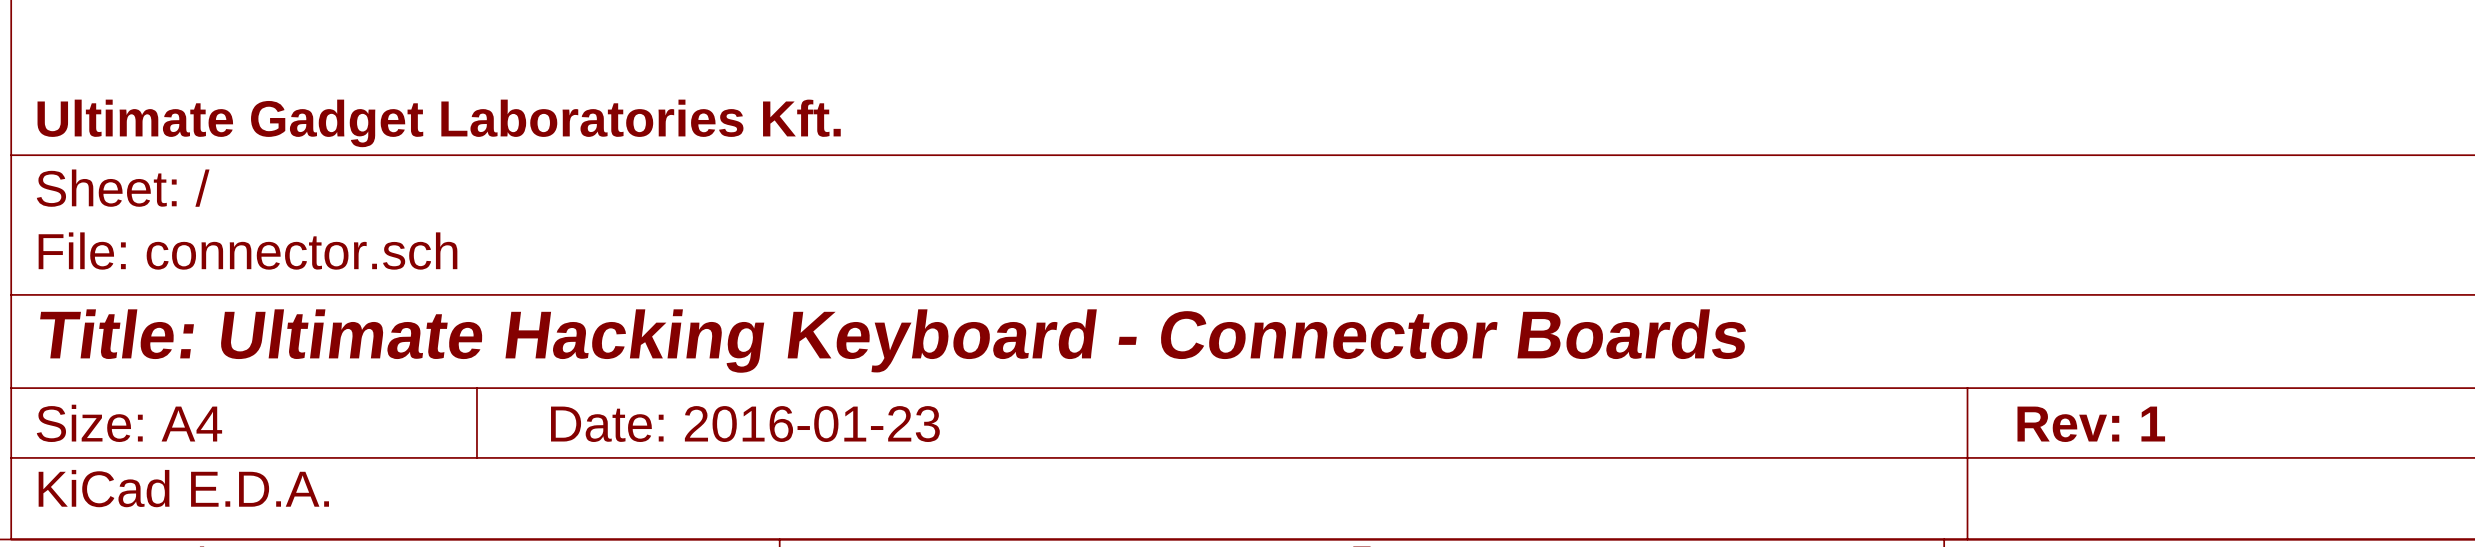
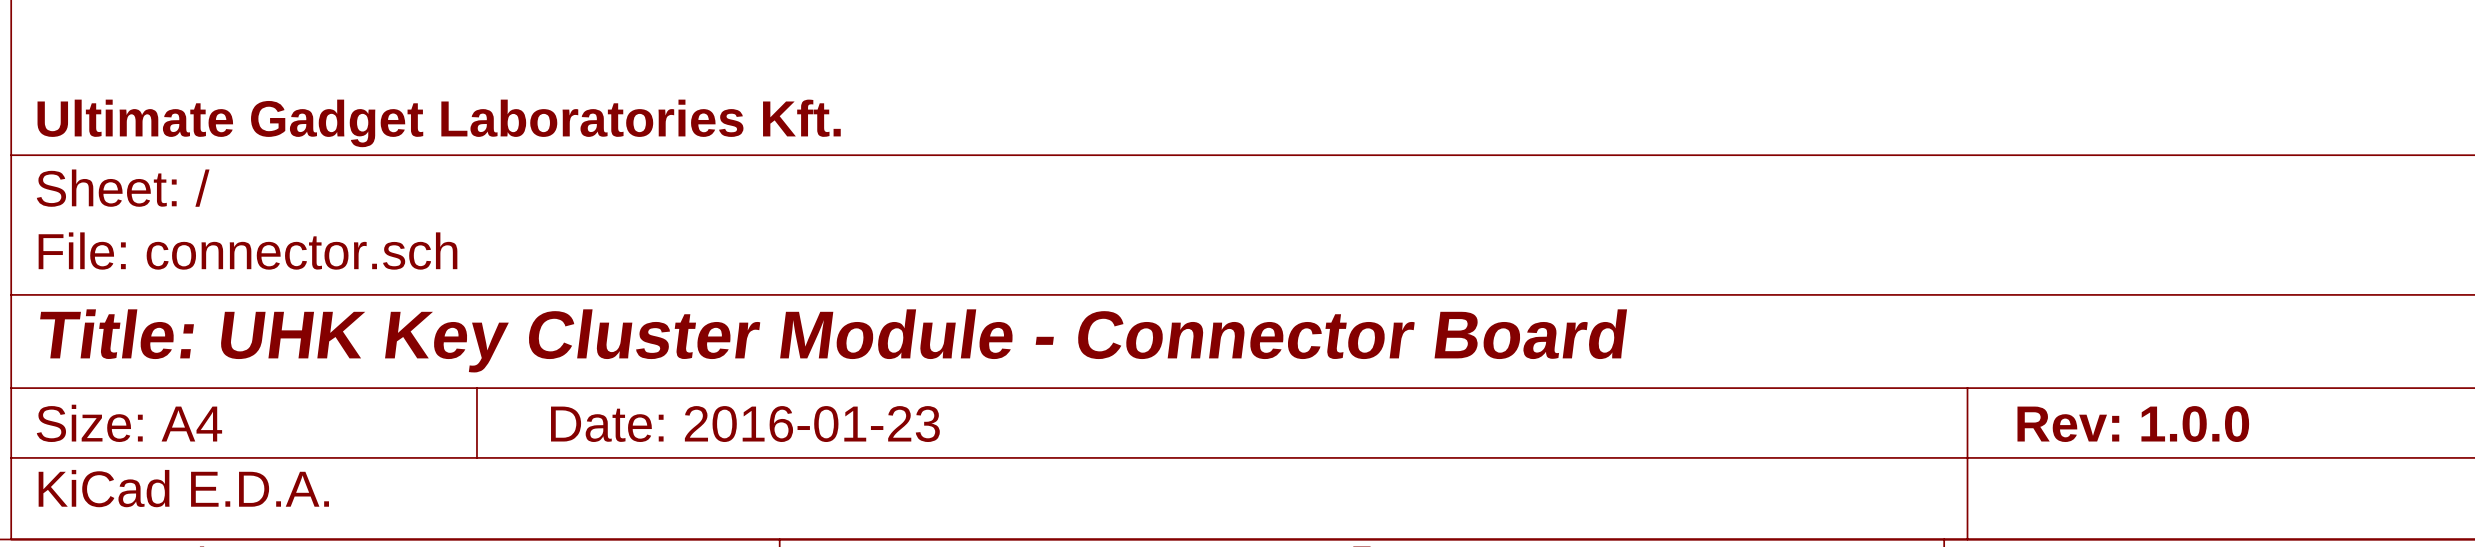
title block: Title: Ultimate Hacking Keyboard - Connector Boards (893, 341) -> Title: UHK Key Cluster Module - Connector Board (833, 340)
title block: Rev: 1 (2091, 424) -> Rev: 1.0.0 (2133, 424)

